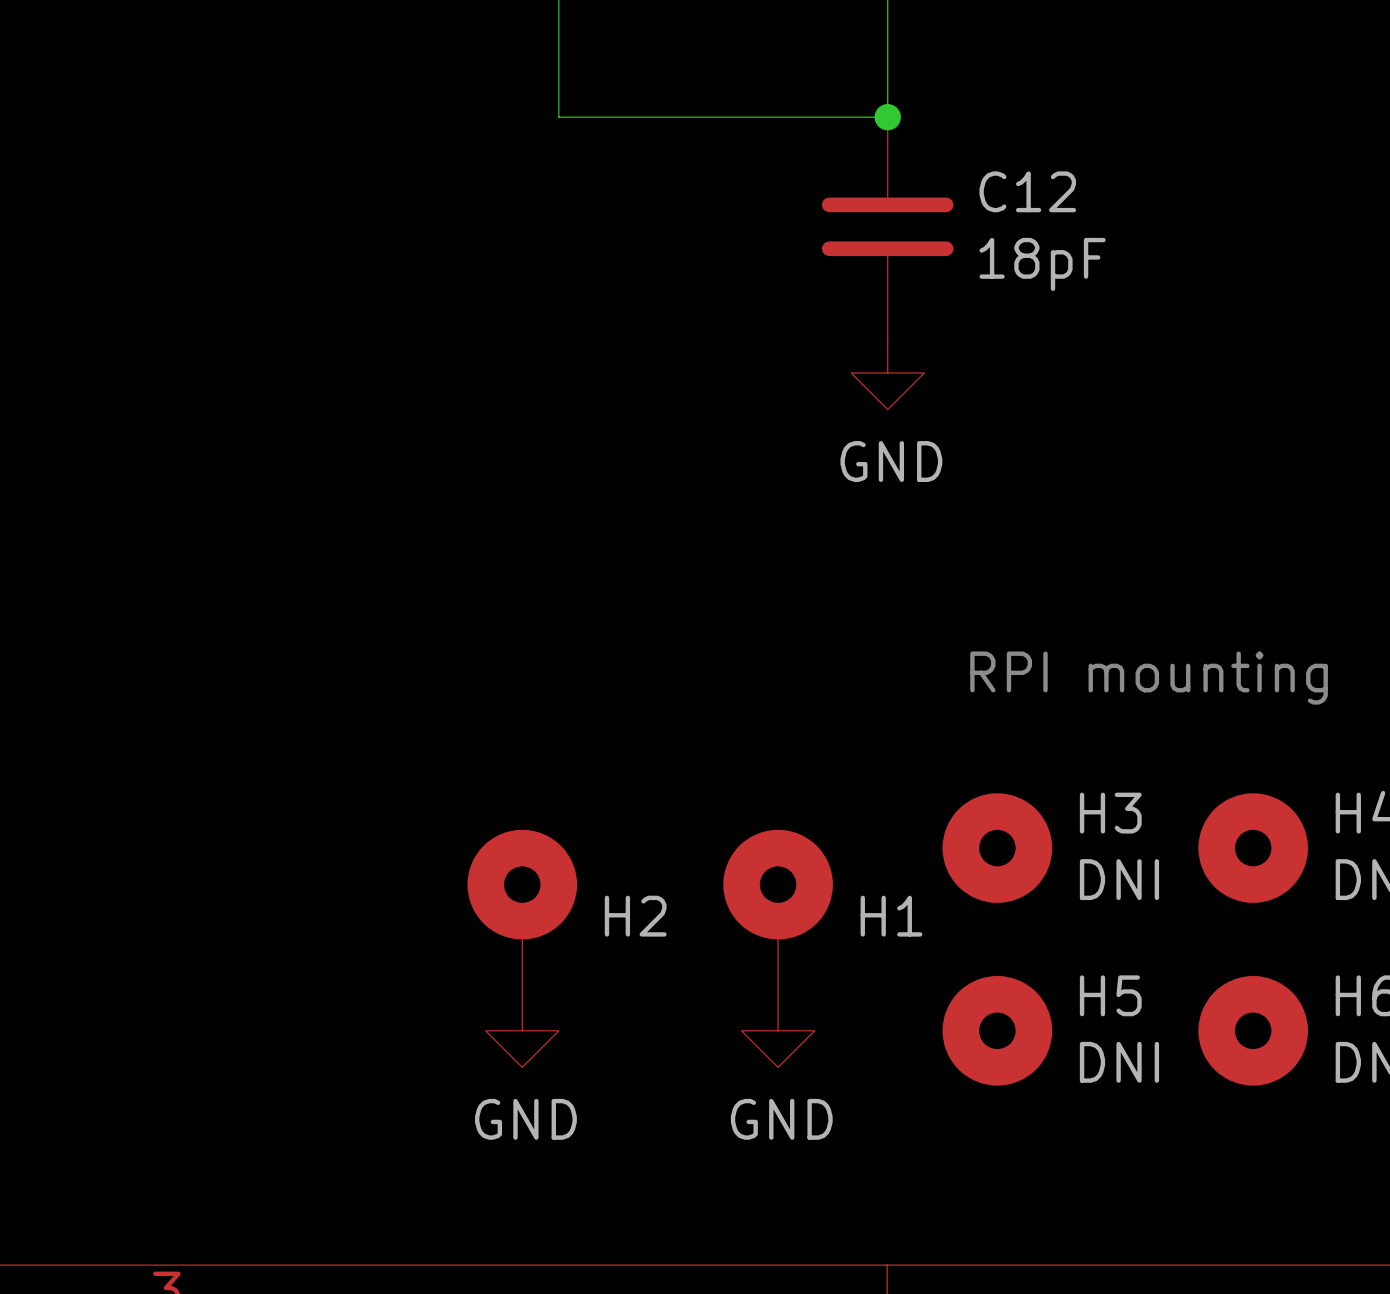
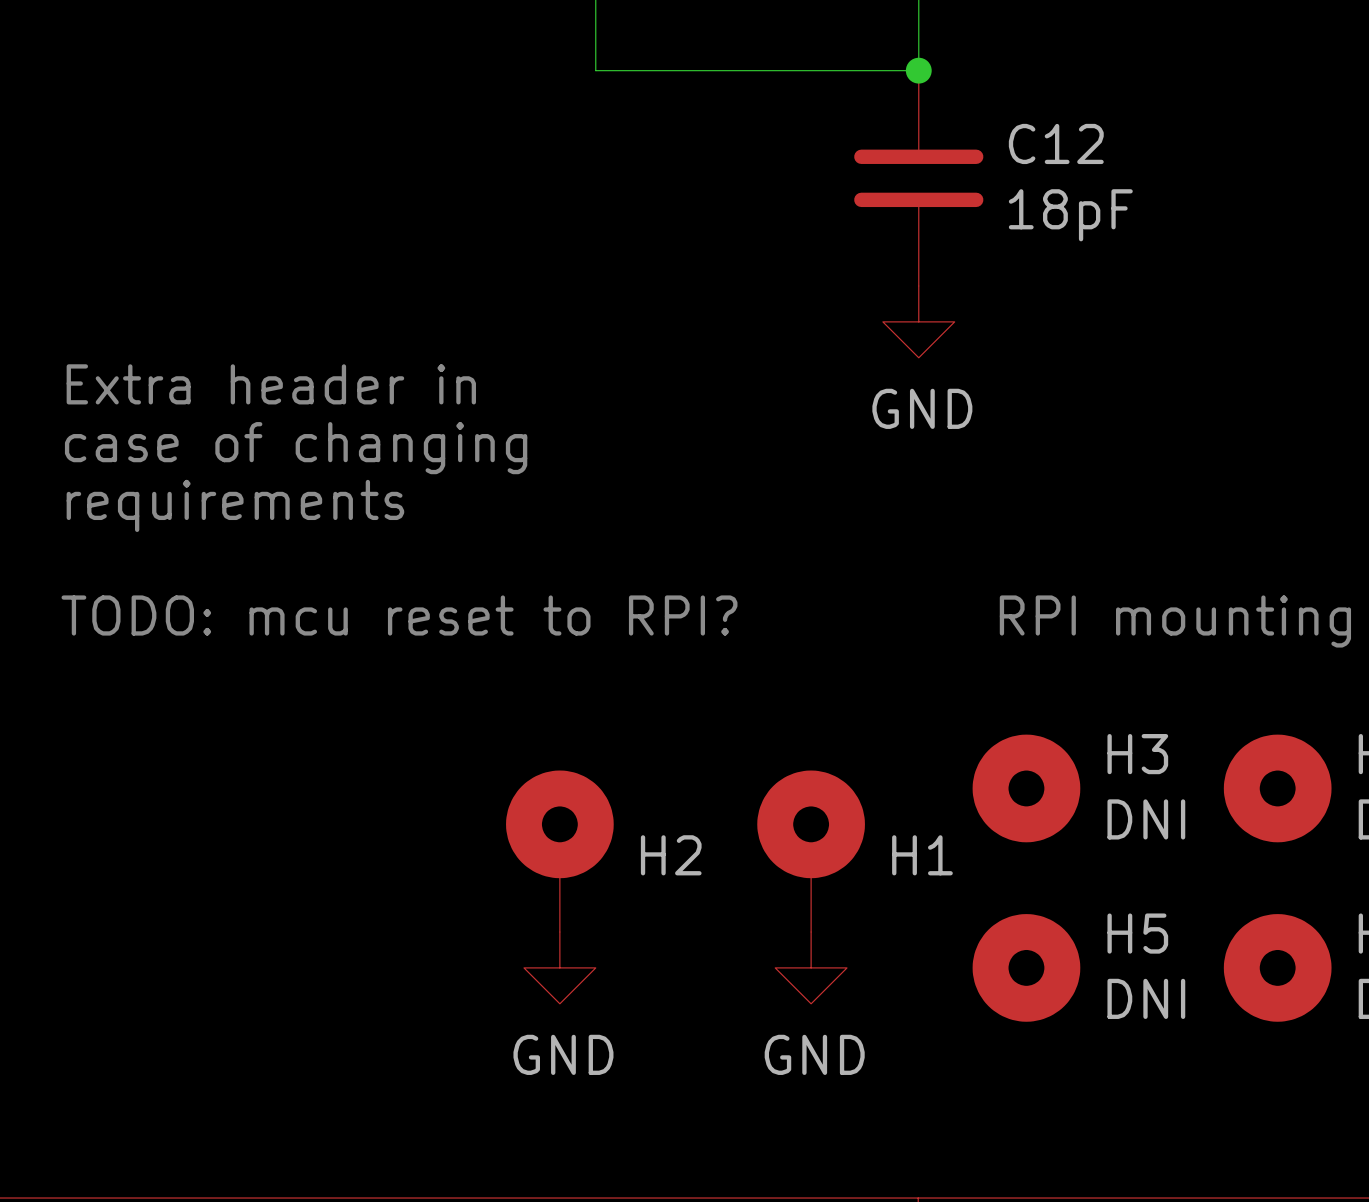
text: none -> Extra header in (271, 384)
text: none -> case of changing (296, 448)
text: none -> requirements (235, 505)
text: none -> TODO: mcu reset to RPI? (399, 615)

